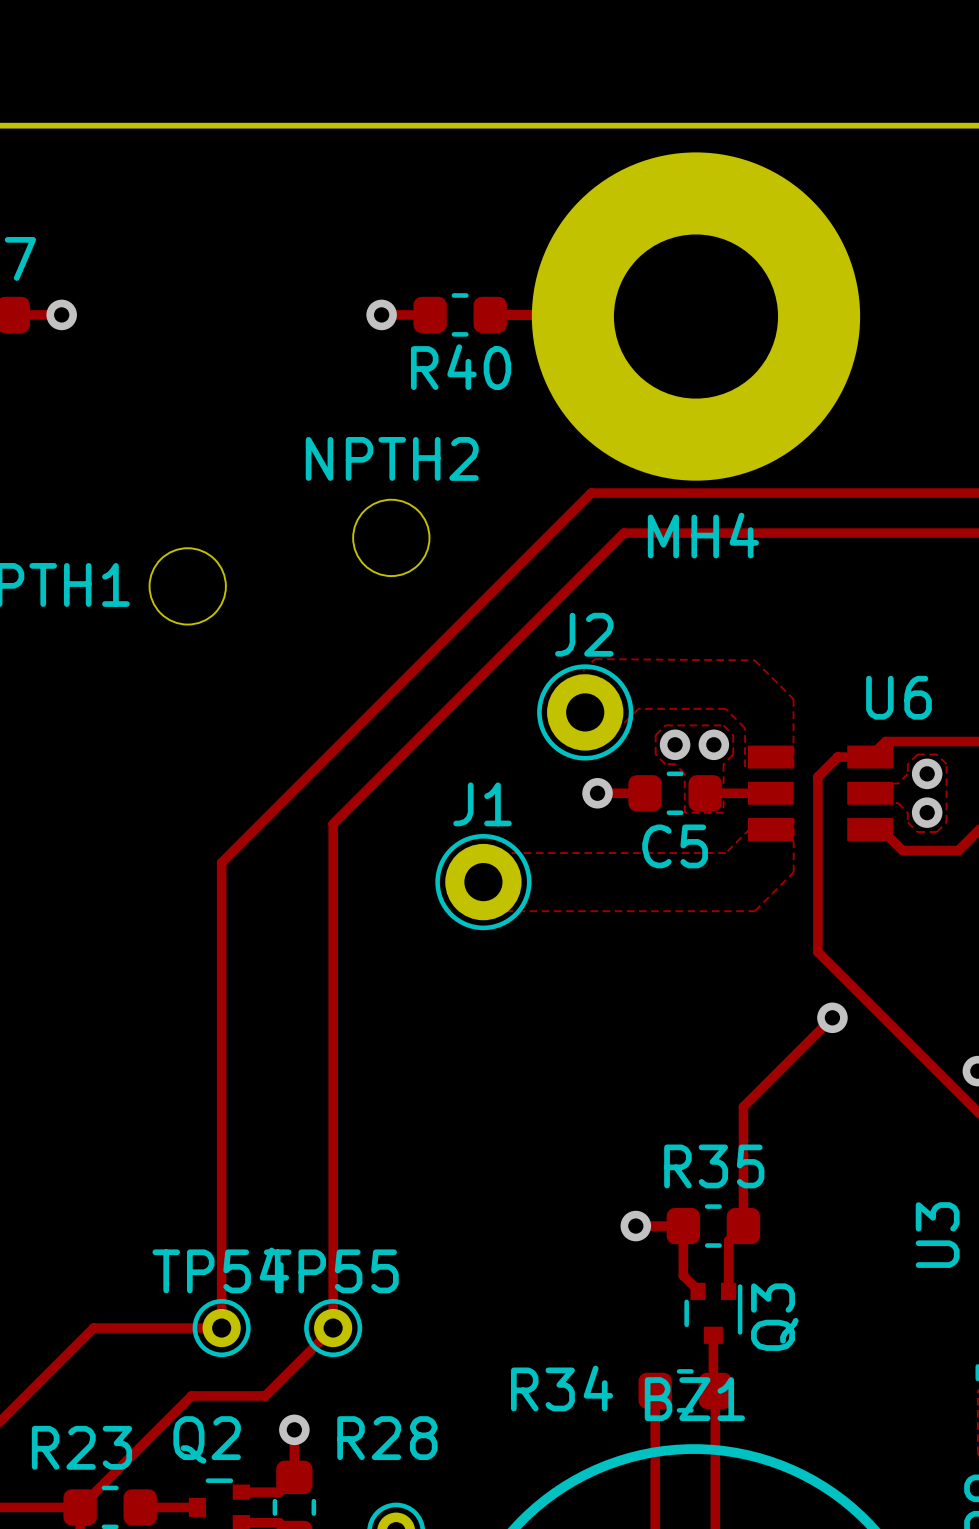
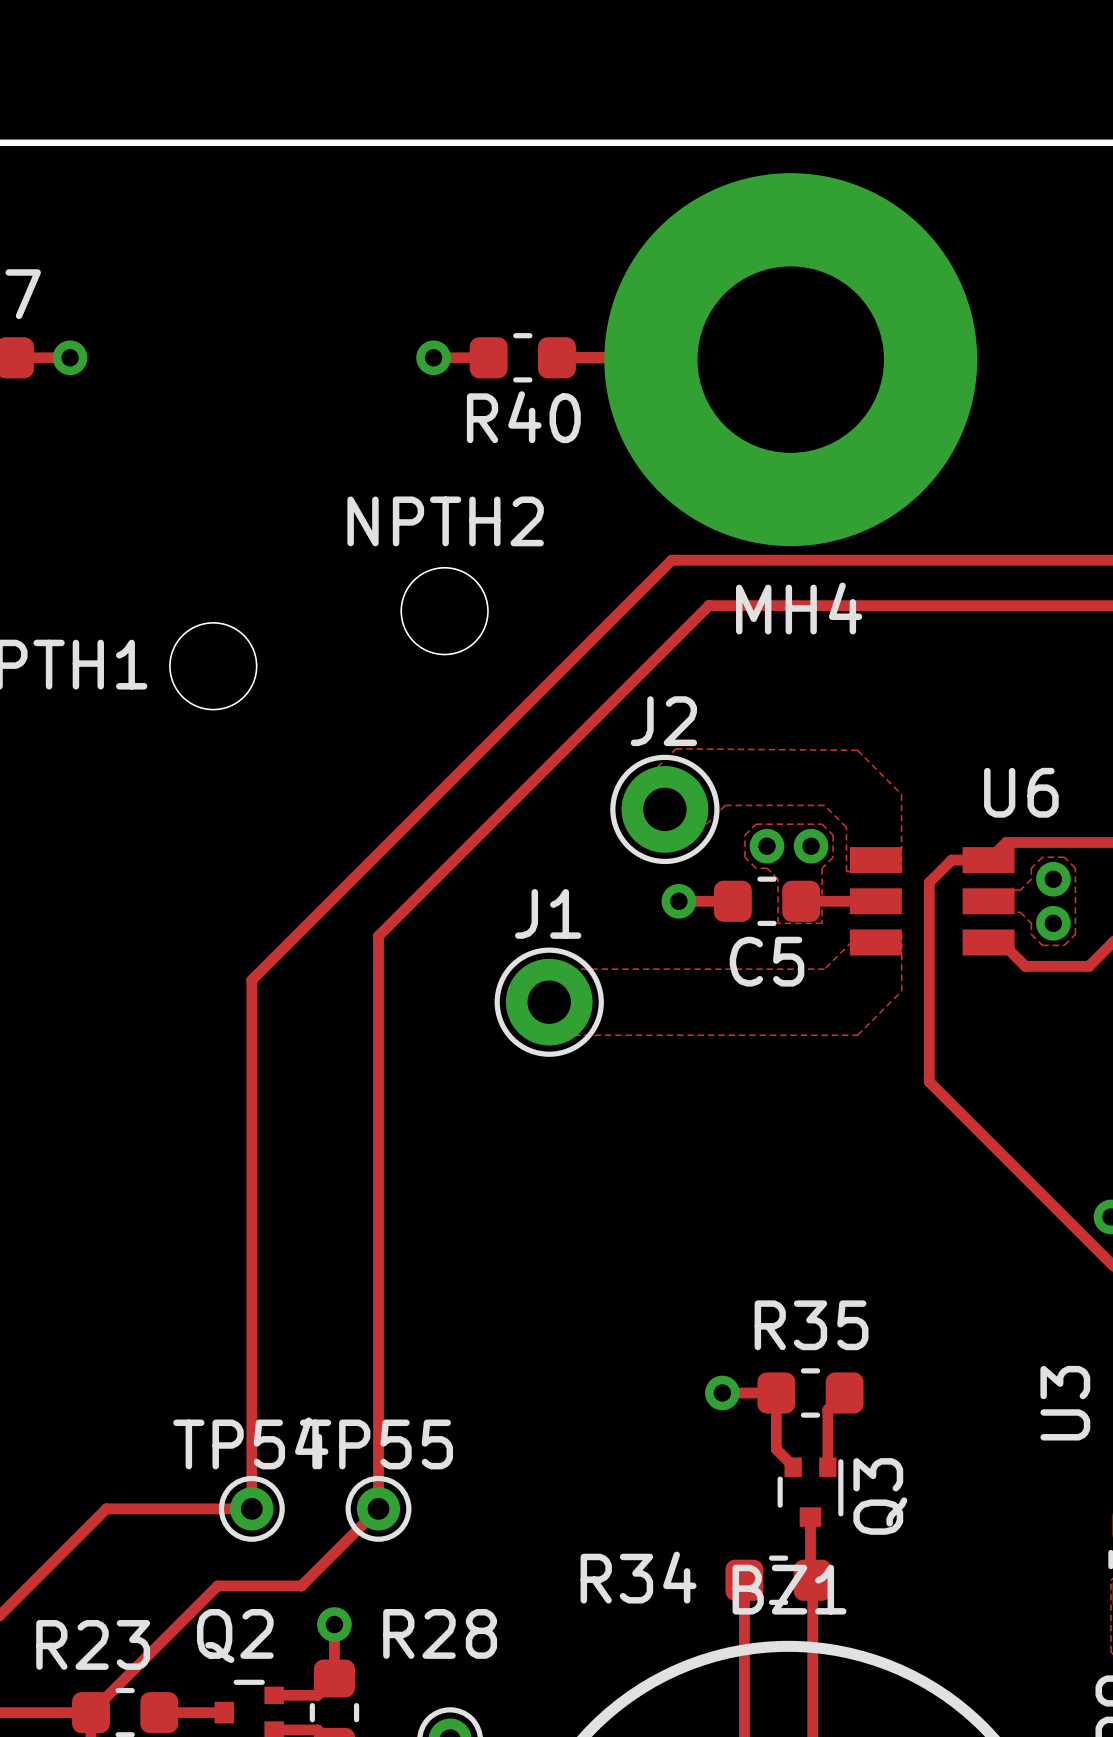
track: (832, 1017) (743, 1106) (743, 1226) -> none
via: (832, 1017) -> none

